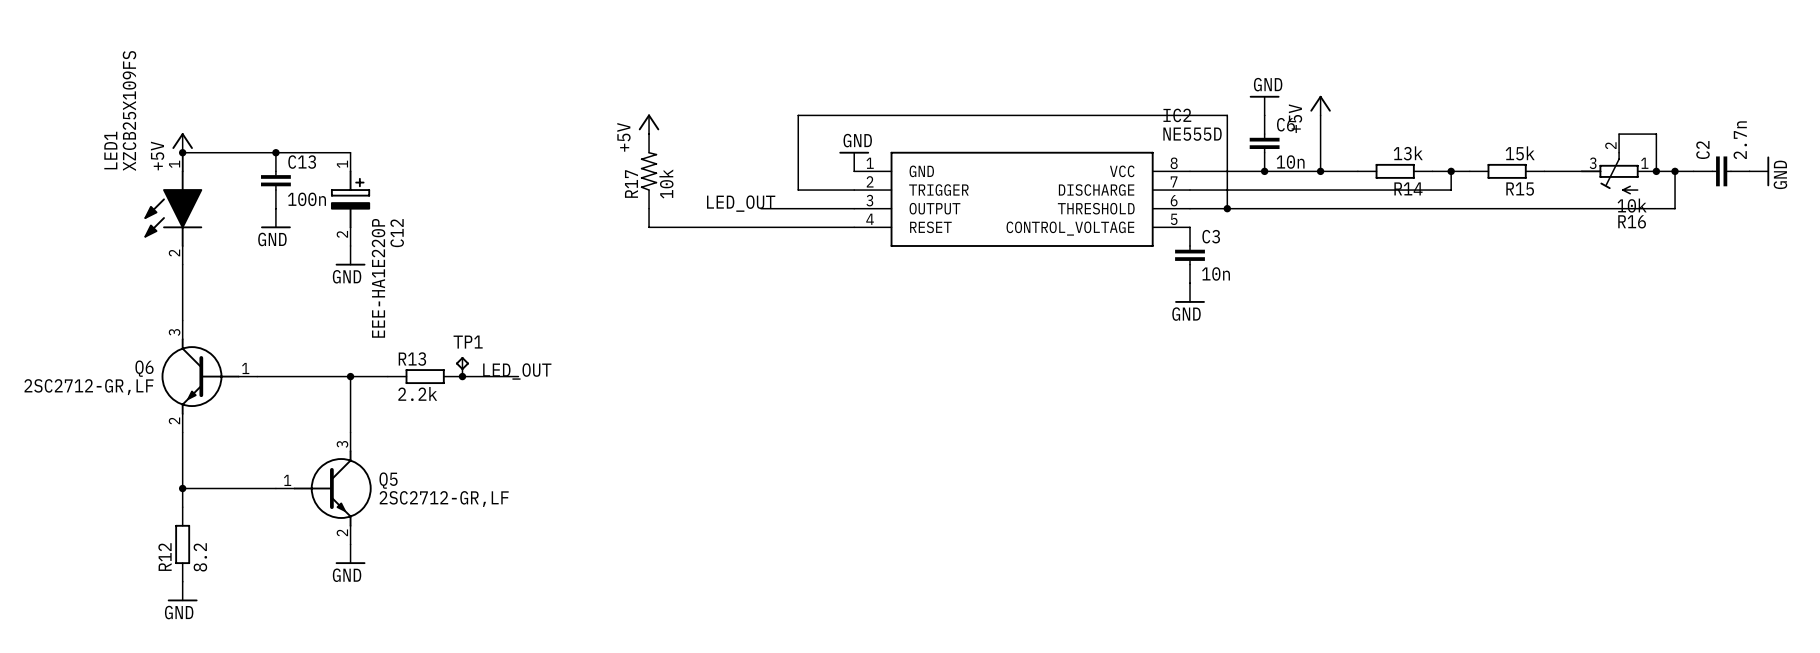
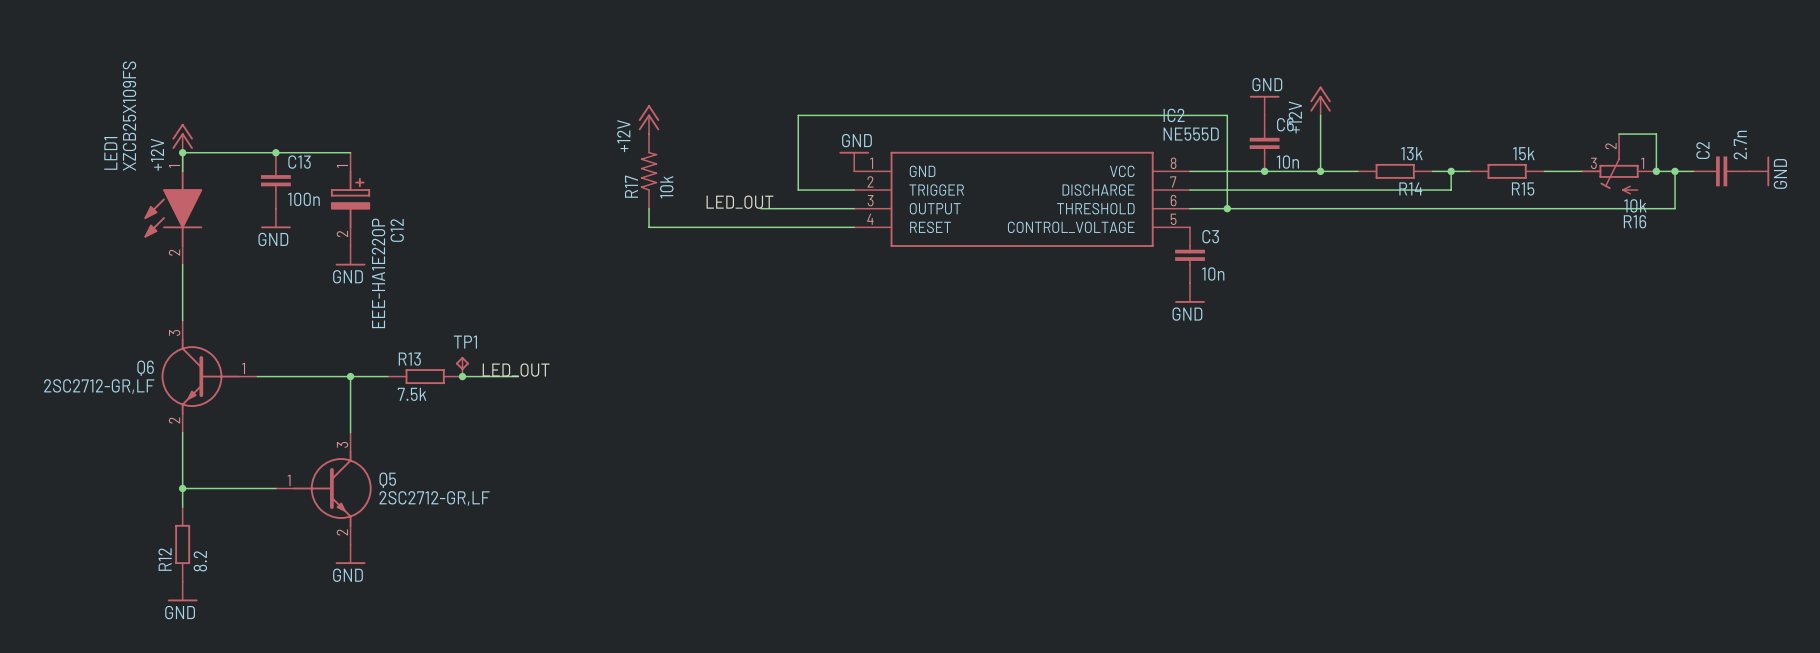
power symbol: +5V (1320, 105) -> +12V (1320, 100)
power symbol: +5V (649, 124) -> +12V (649, 119)
power symbol: +5V (182, 142) -> +12V (182, 138)
R13 value: 2.2k (417, 393) -> 7.5k (412, 394)

